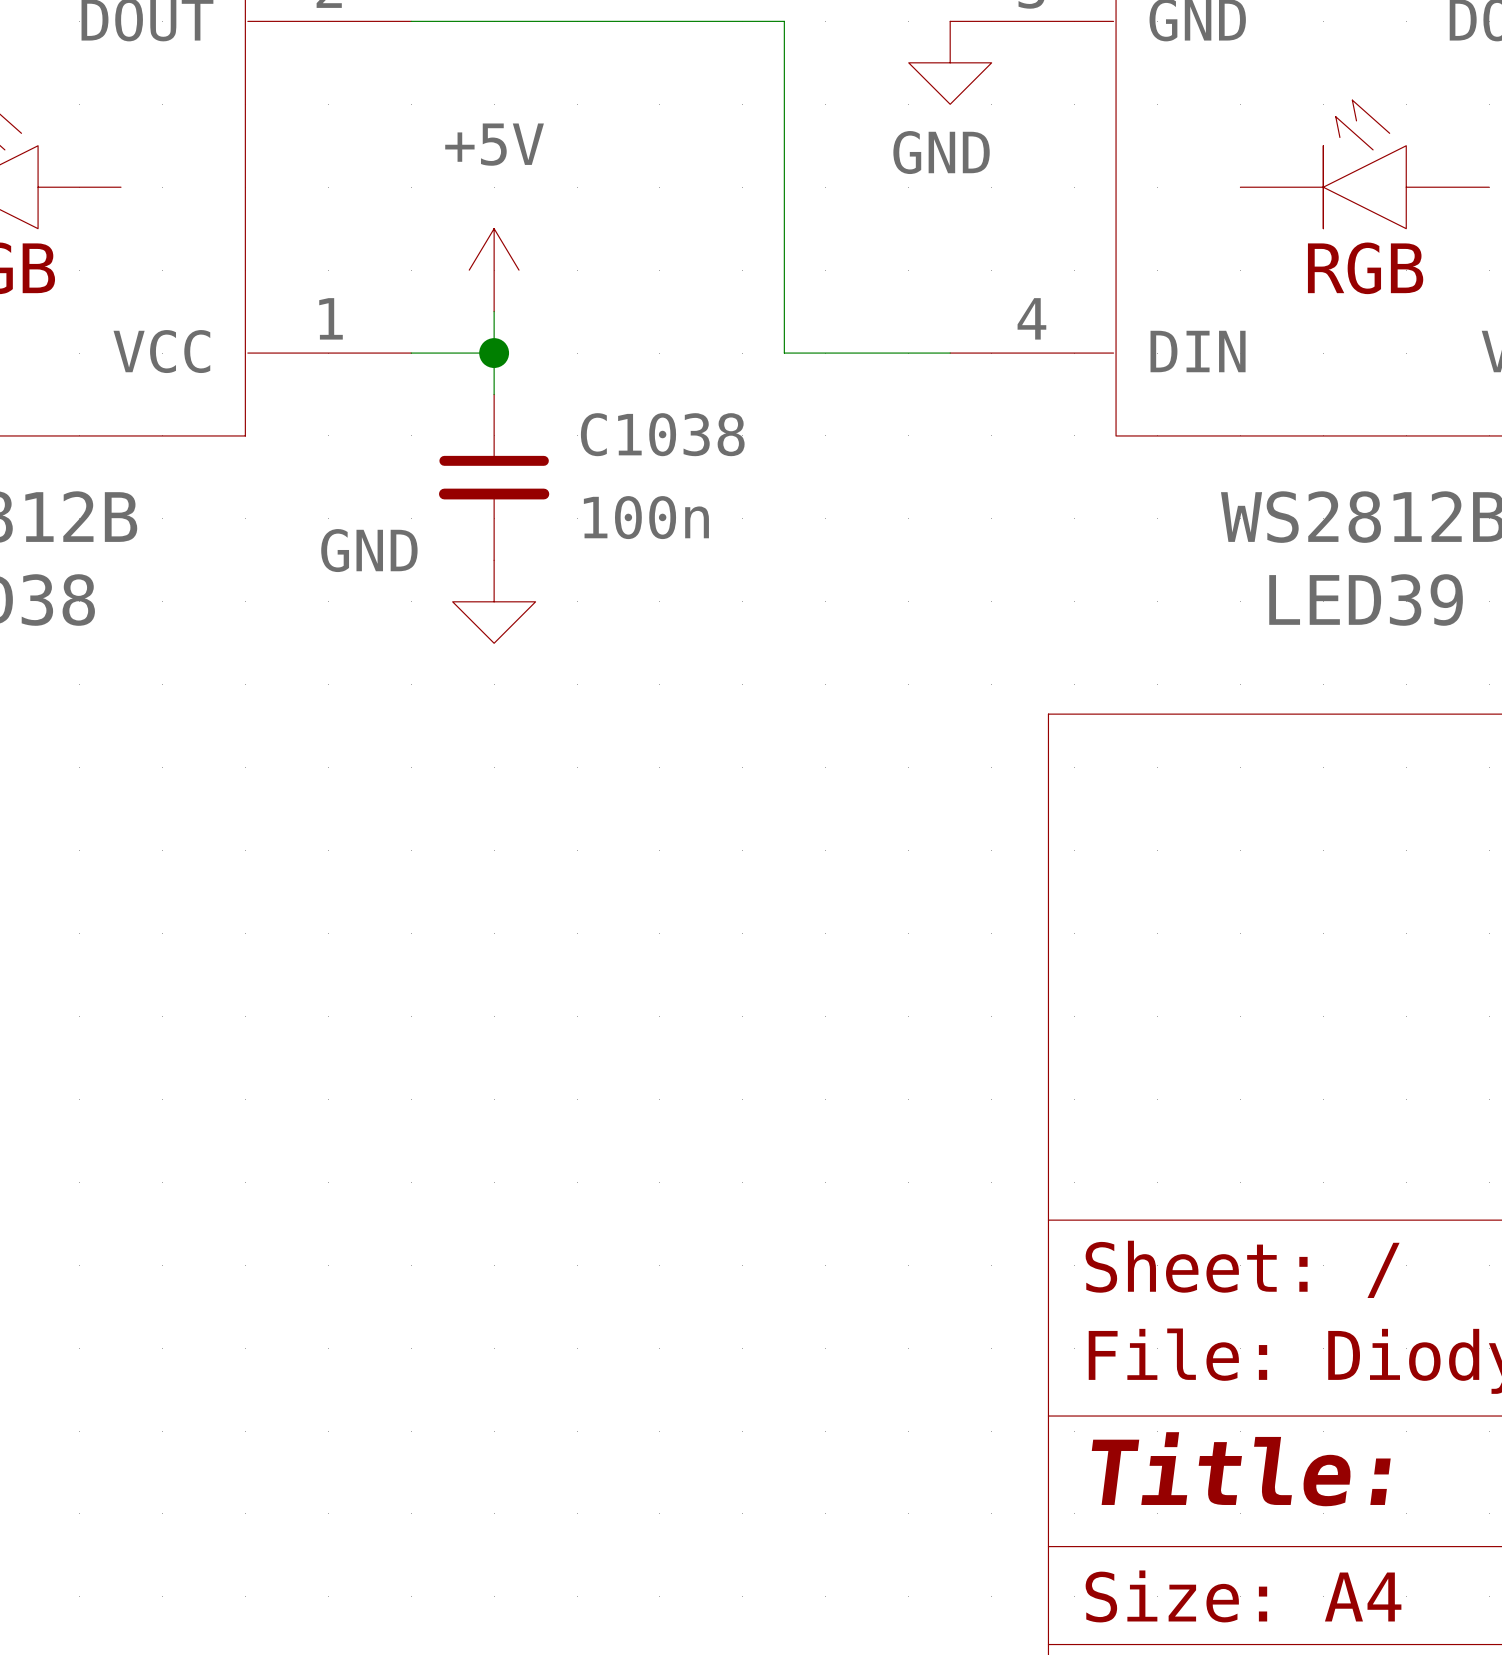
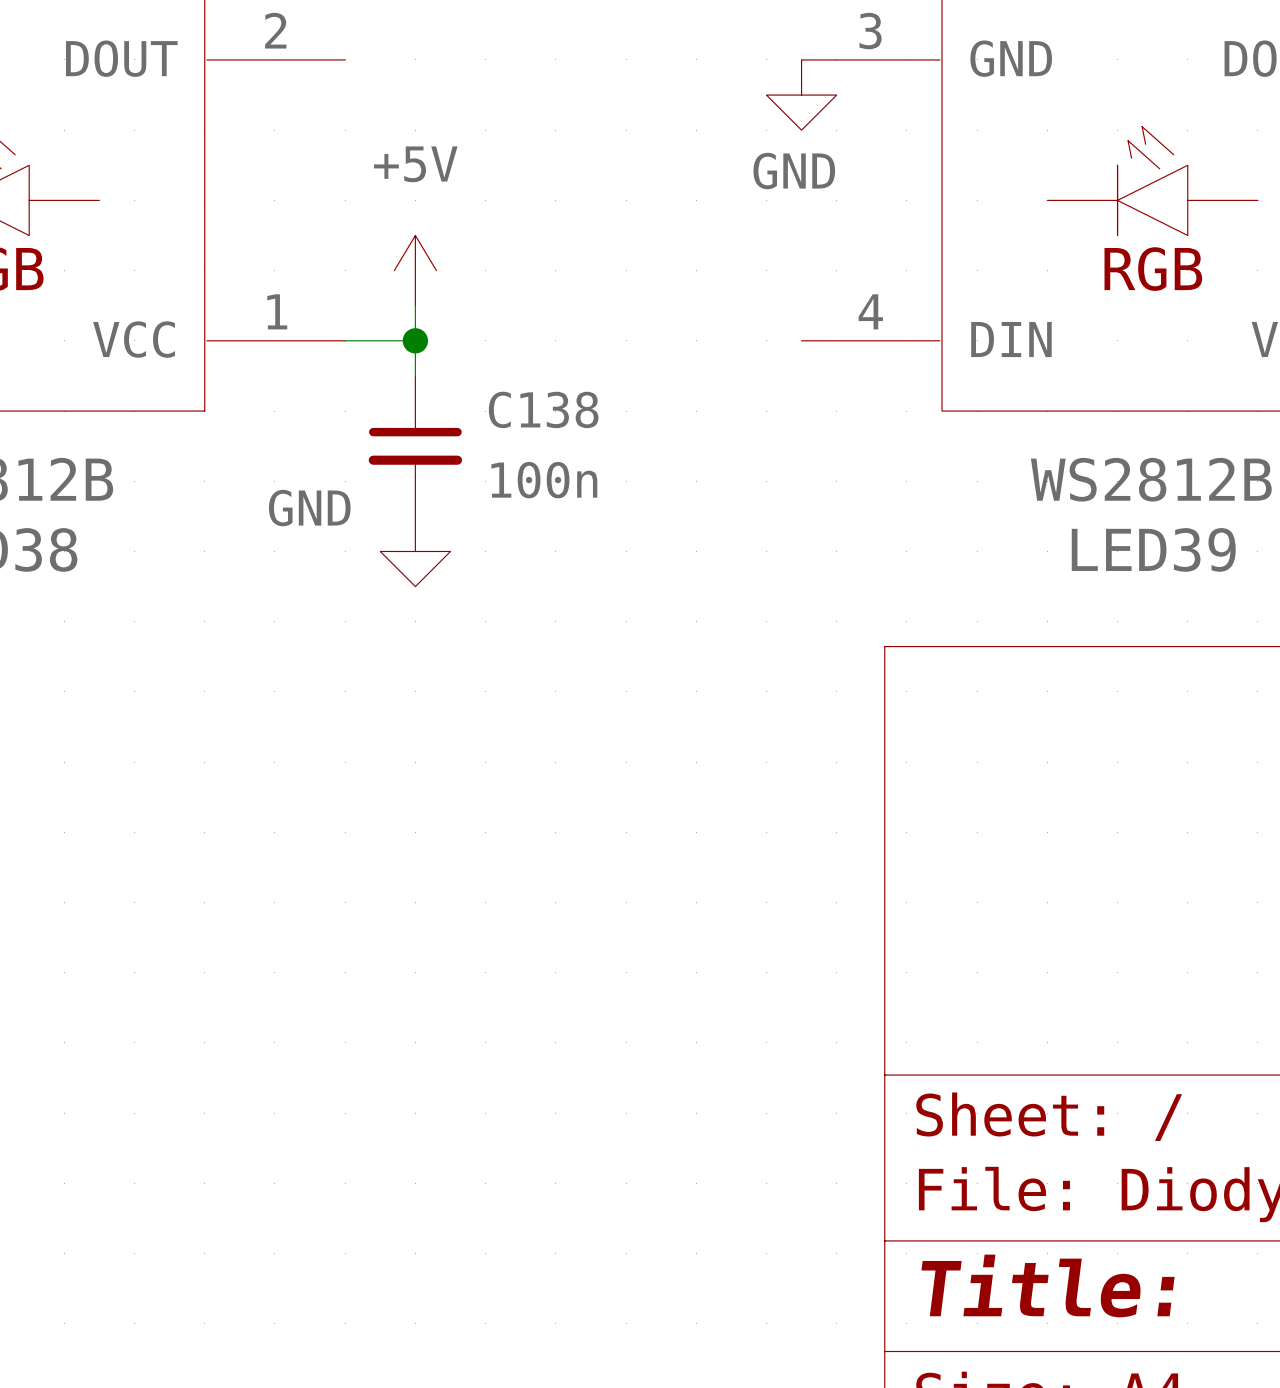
wire: (411, 21) (784, 21) (784, 353) (950, 353) -> none
C1038 name: C1038 (662, 434) -> C138 (543, 409)

